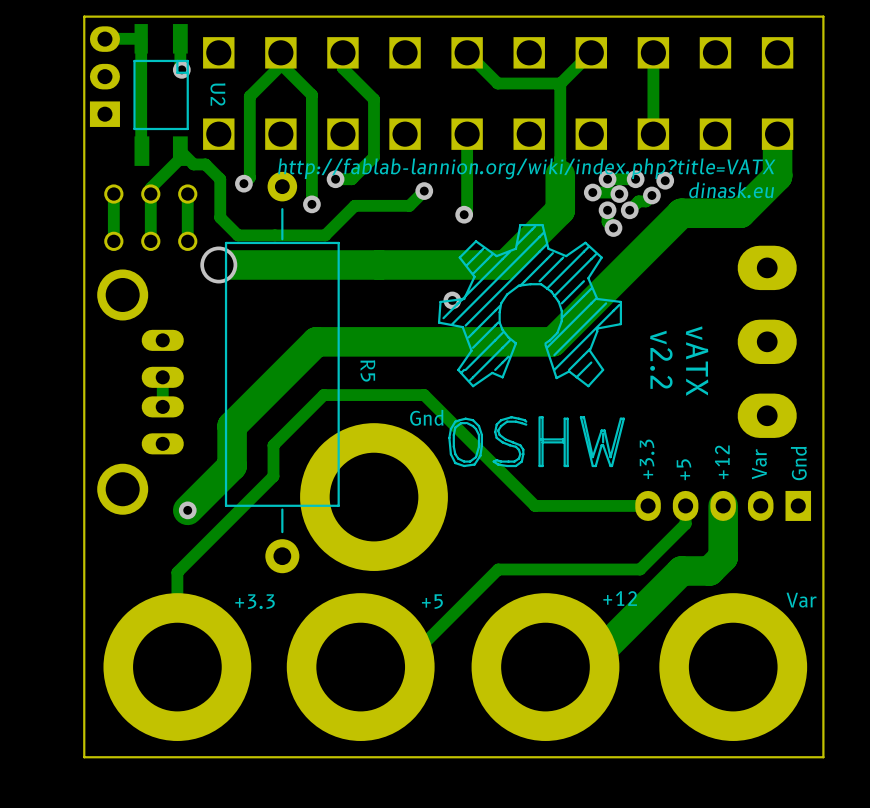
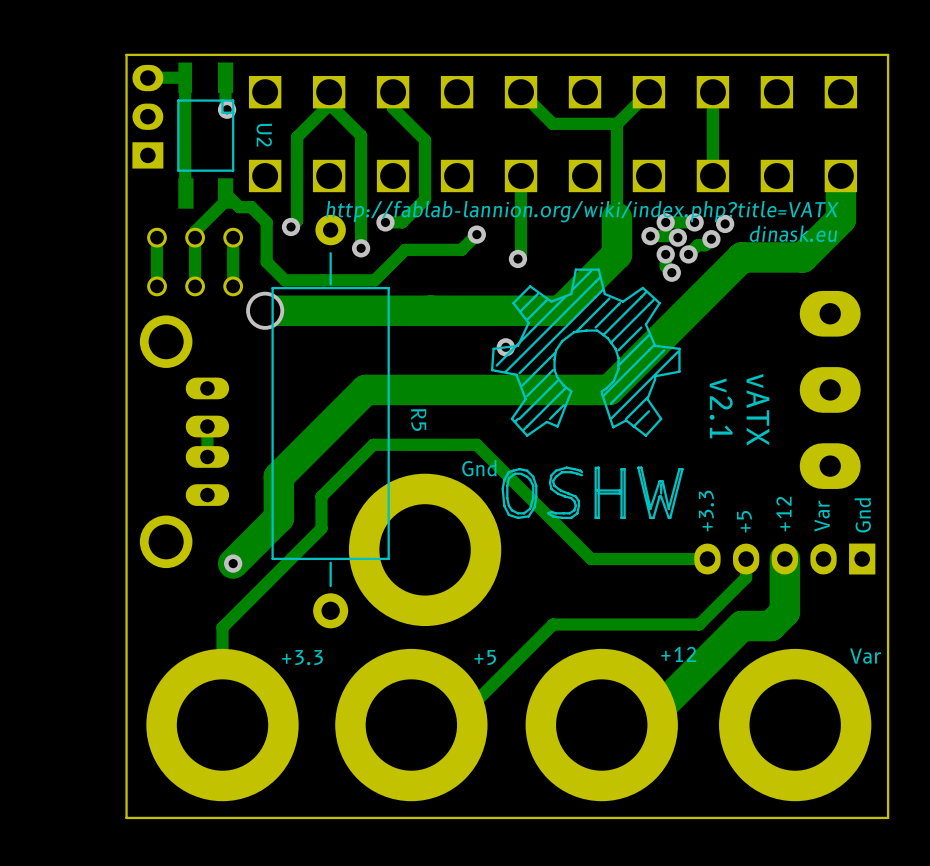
text: v2.2 (661, 359) -> v2.1 (721, 408)

